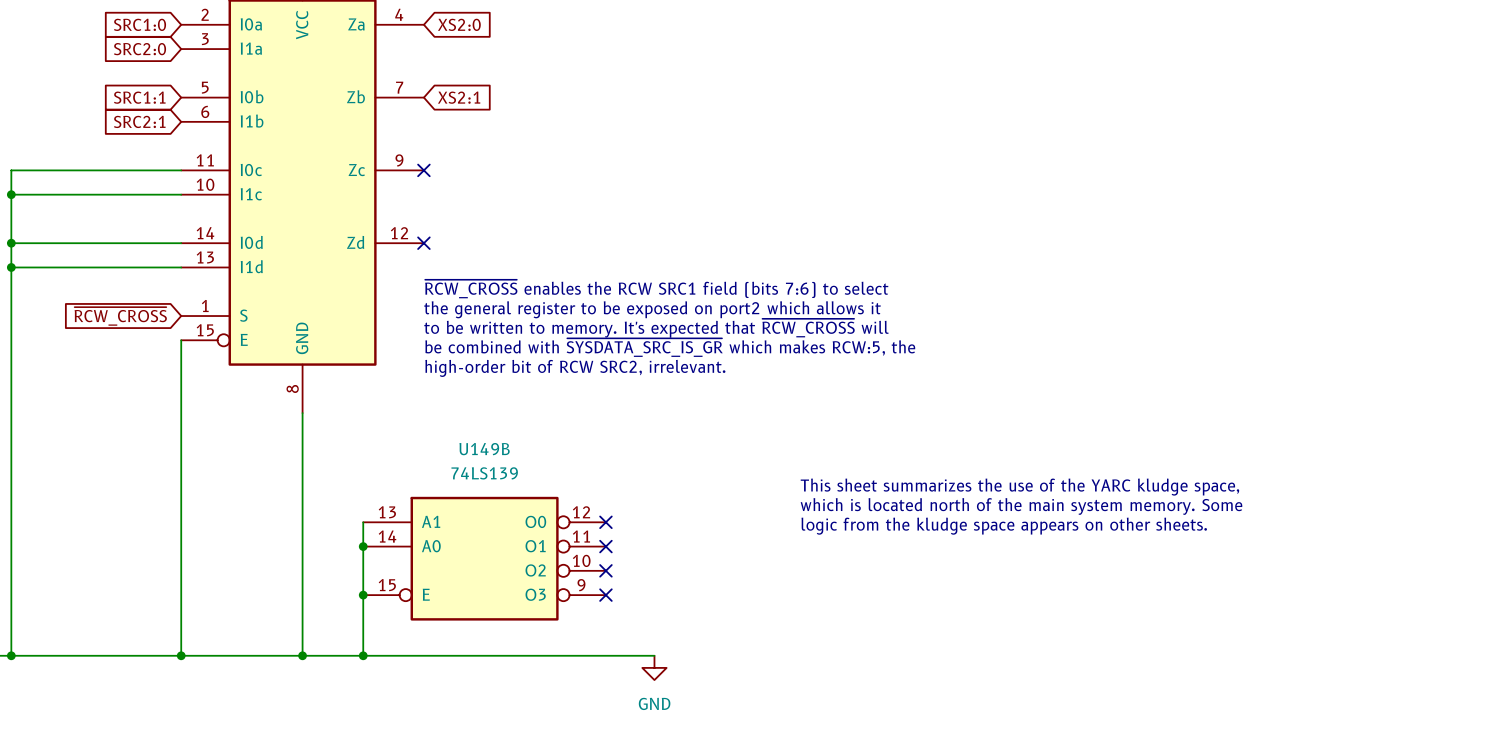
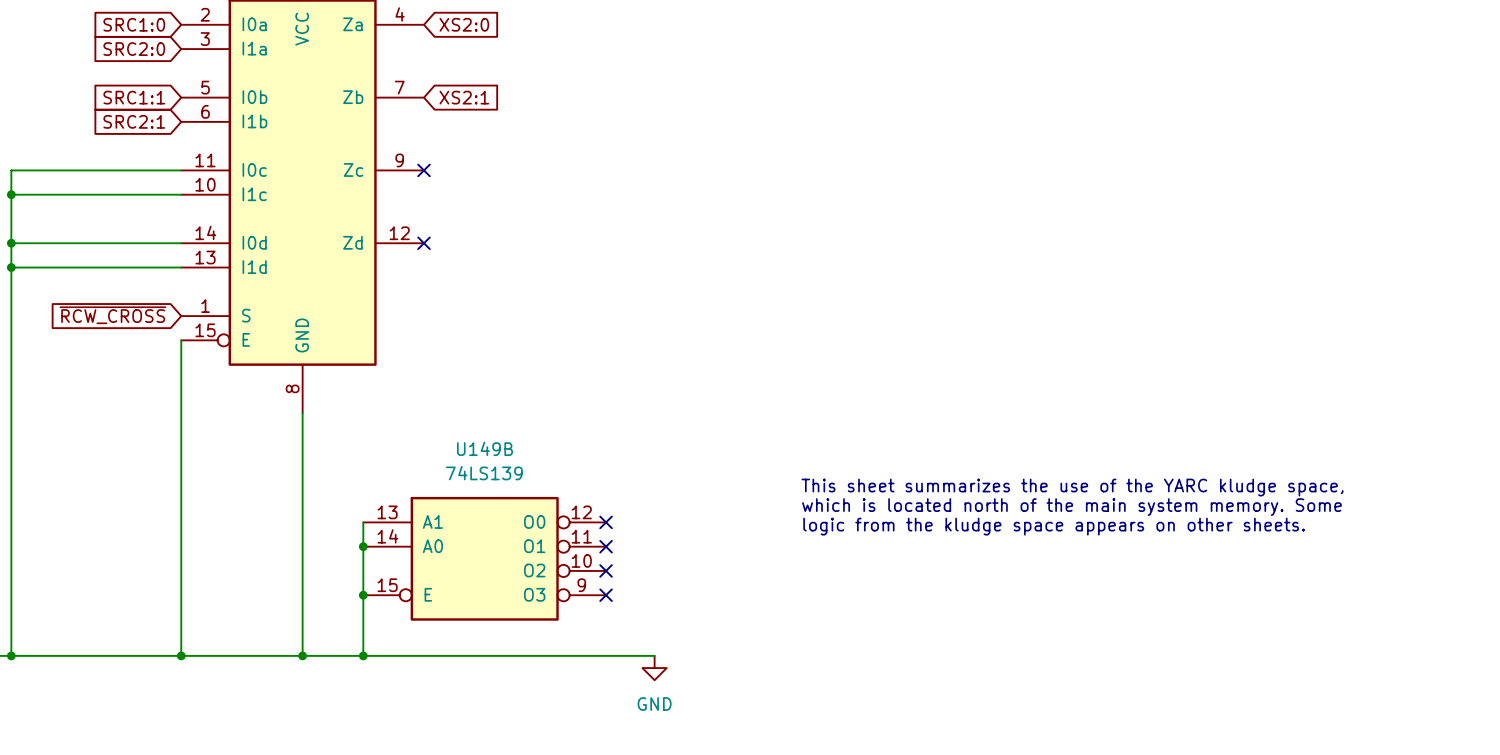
text: ~{RCW_CROSS} enables the RCW SRC1 field (bits 7:6) to select (656, 289) -> none
text: the general register to be exposed on port2 which allows it (652, 309) -> none
text: to be written to memory. It's expected that ~{RCW_CROSS} will (656, 328) -> none
text: be combined with ~{SYSDATA_SRC_IS_GR} which makes RCW:5, the (670, 347) -> none
text: high-order bit of RCW SRC2, irrelevant. (575, 368) -> none

